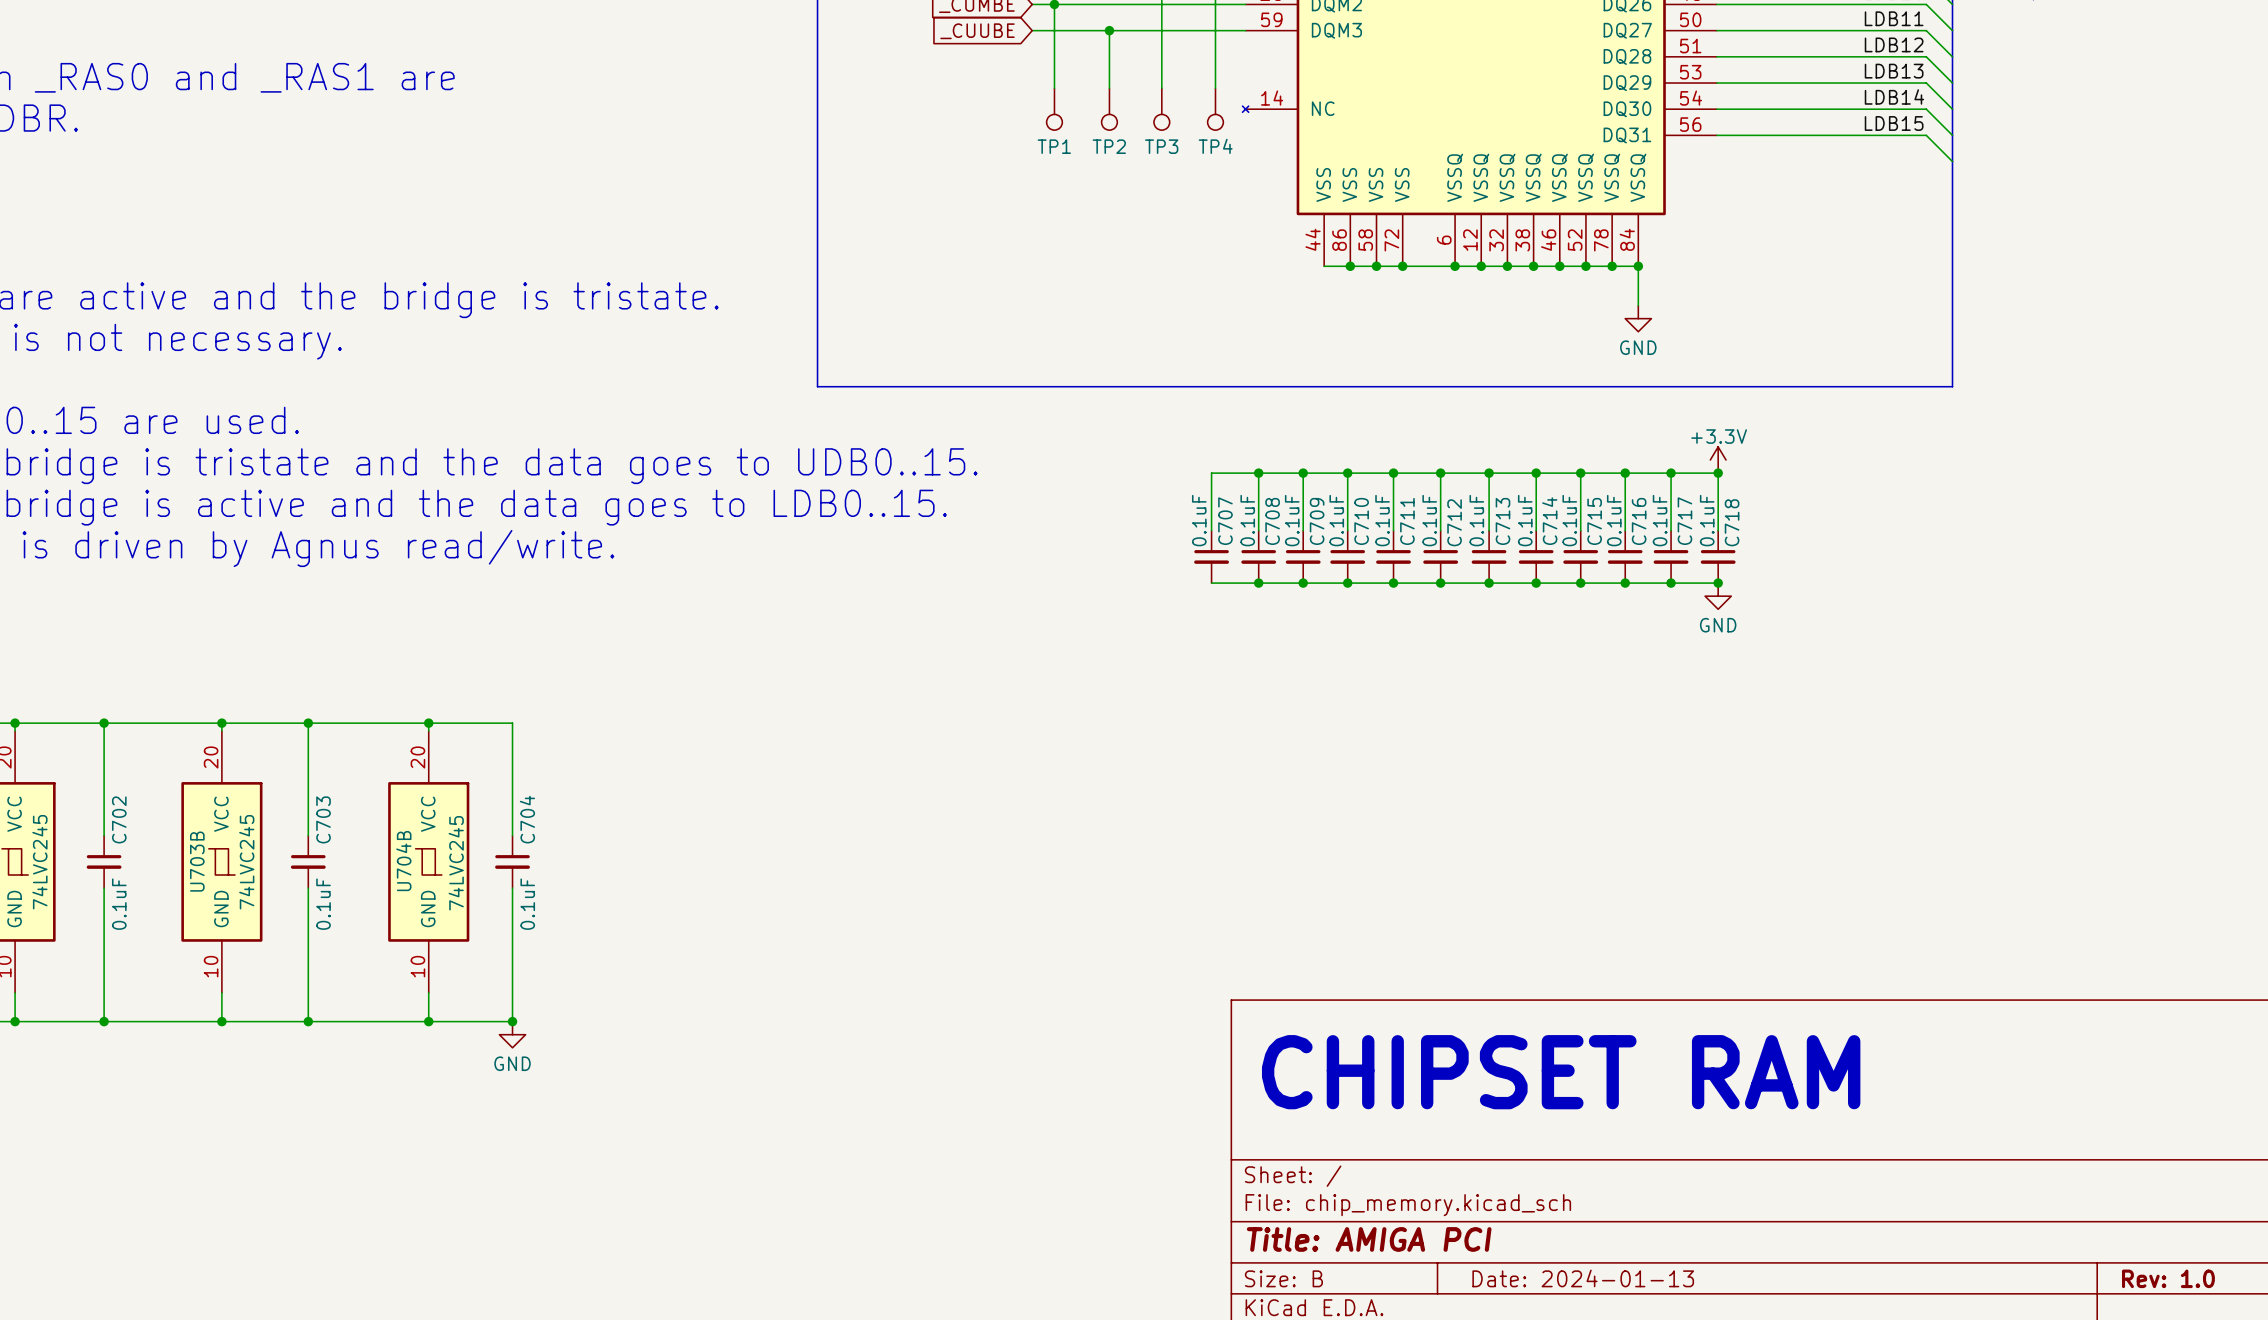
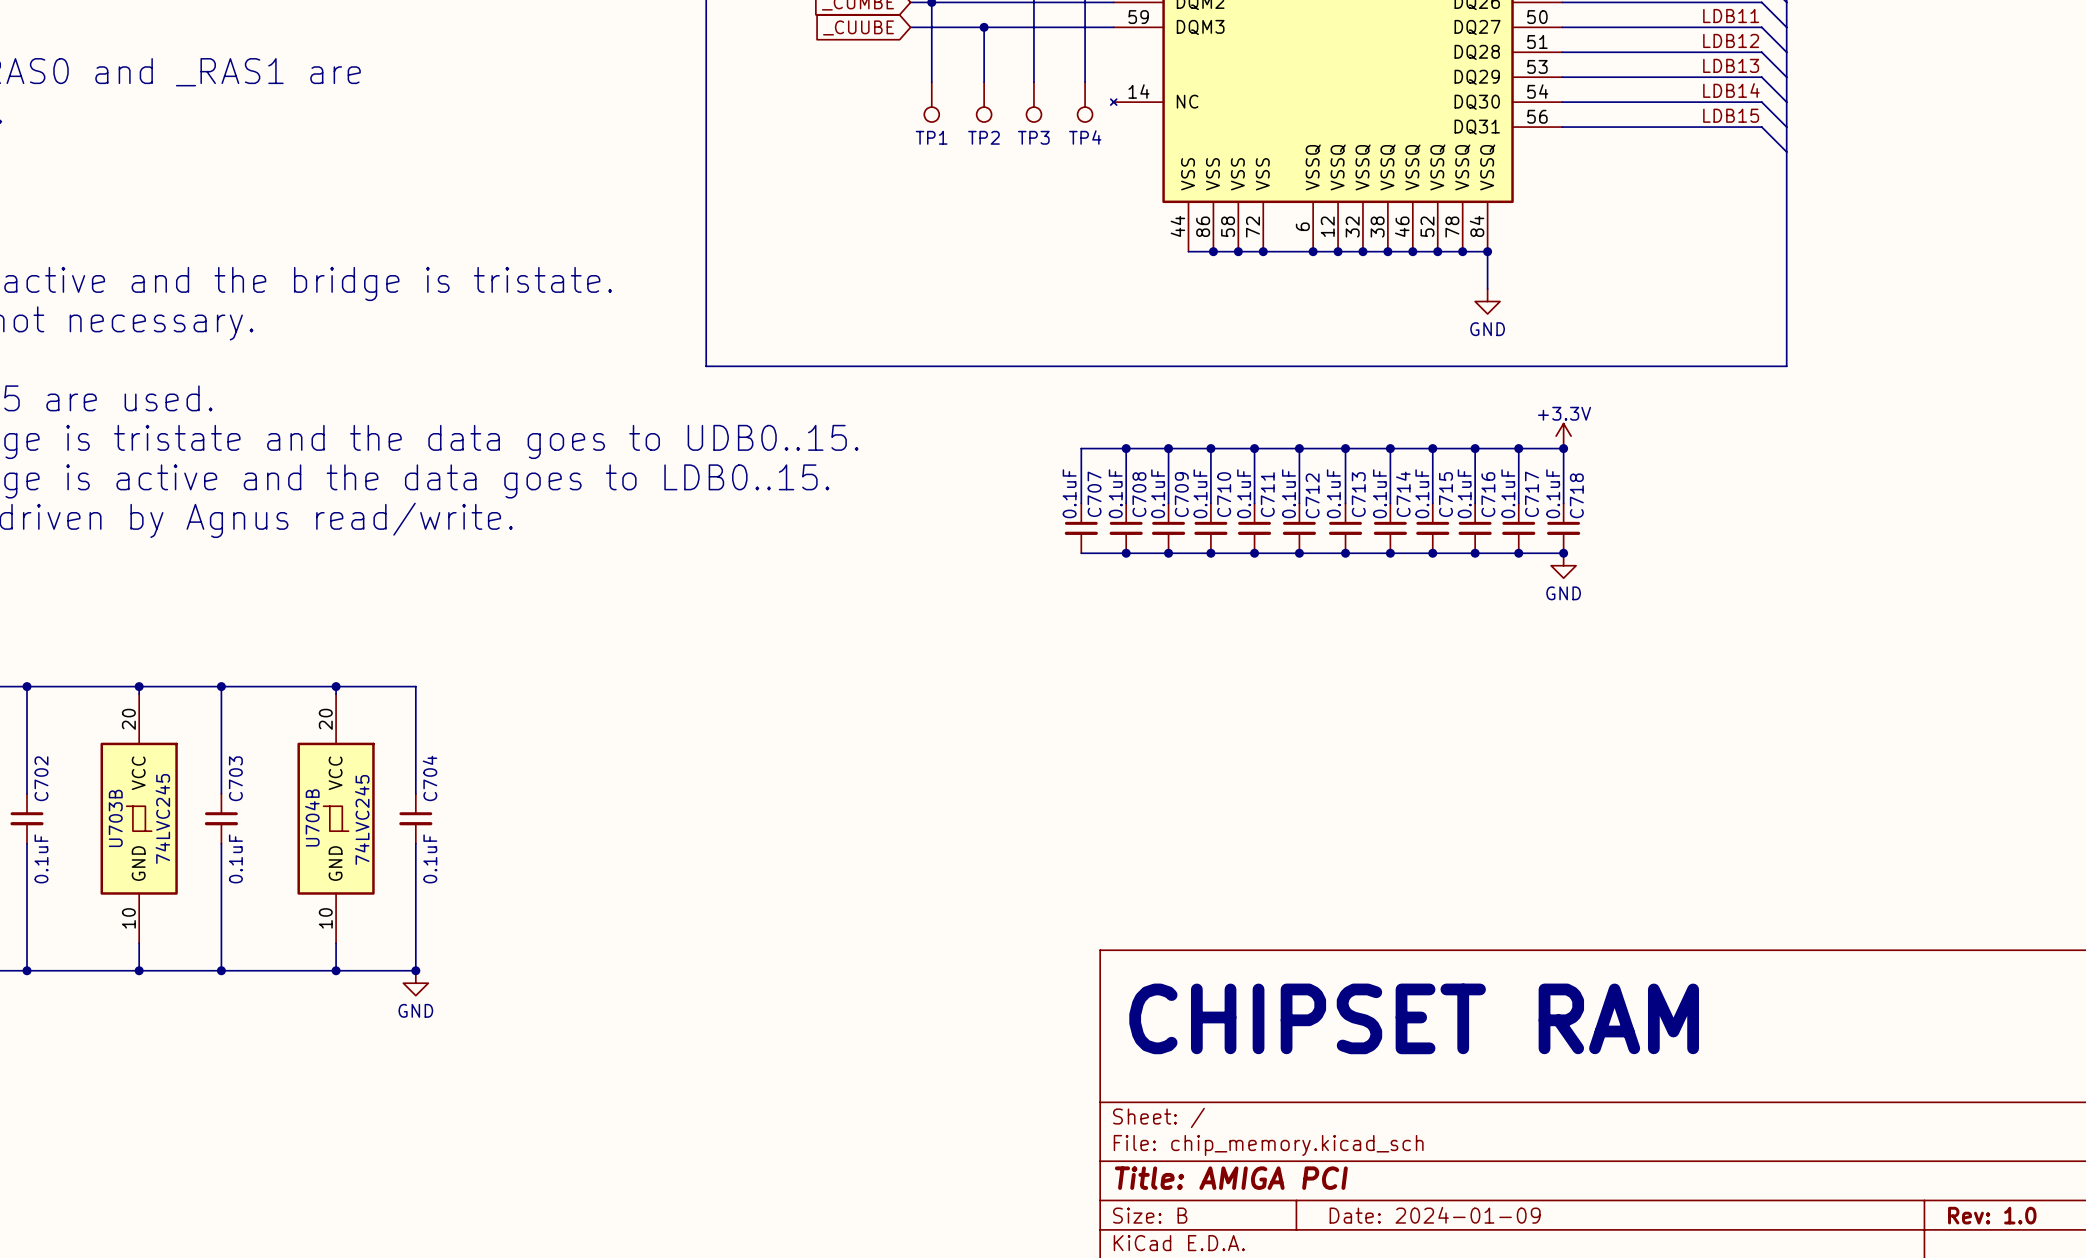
title block: Date: 2024-01-13 (1583, 1278) -> Date: 2024-01-09 (1435, 1215)

